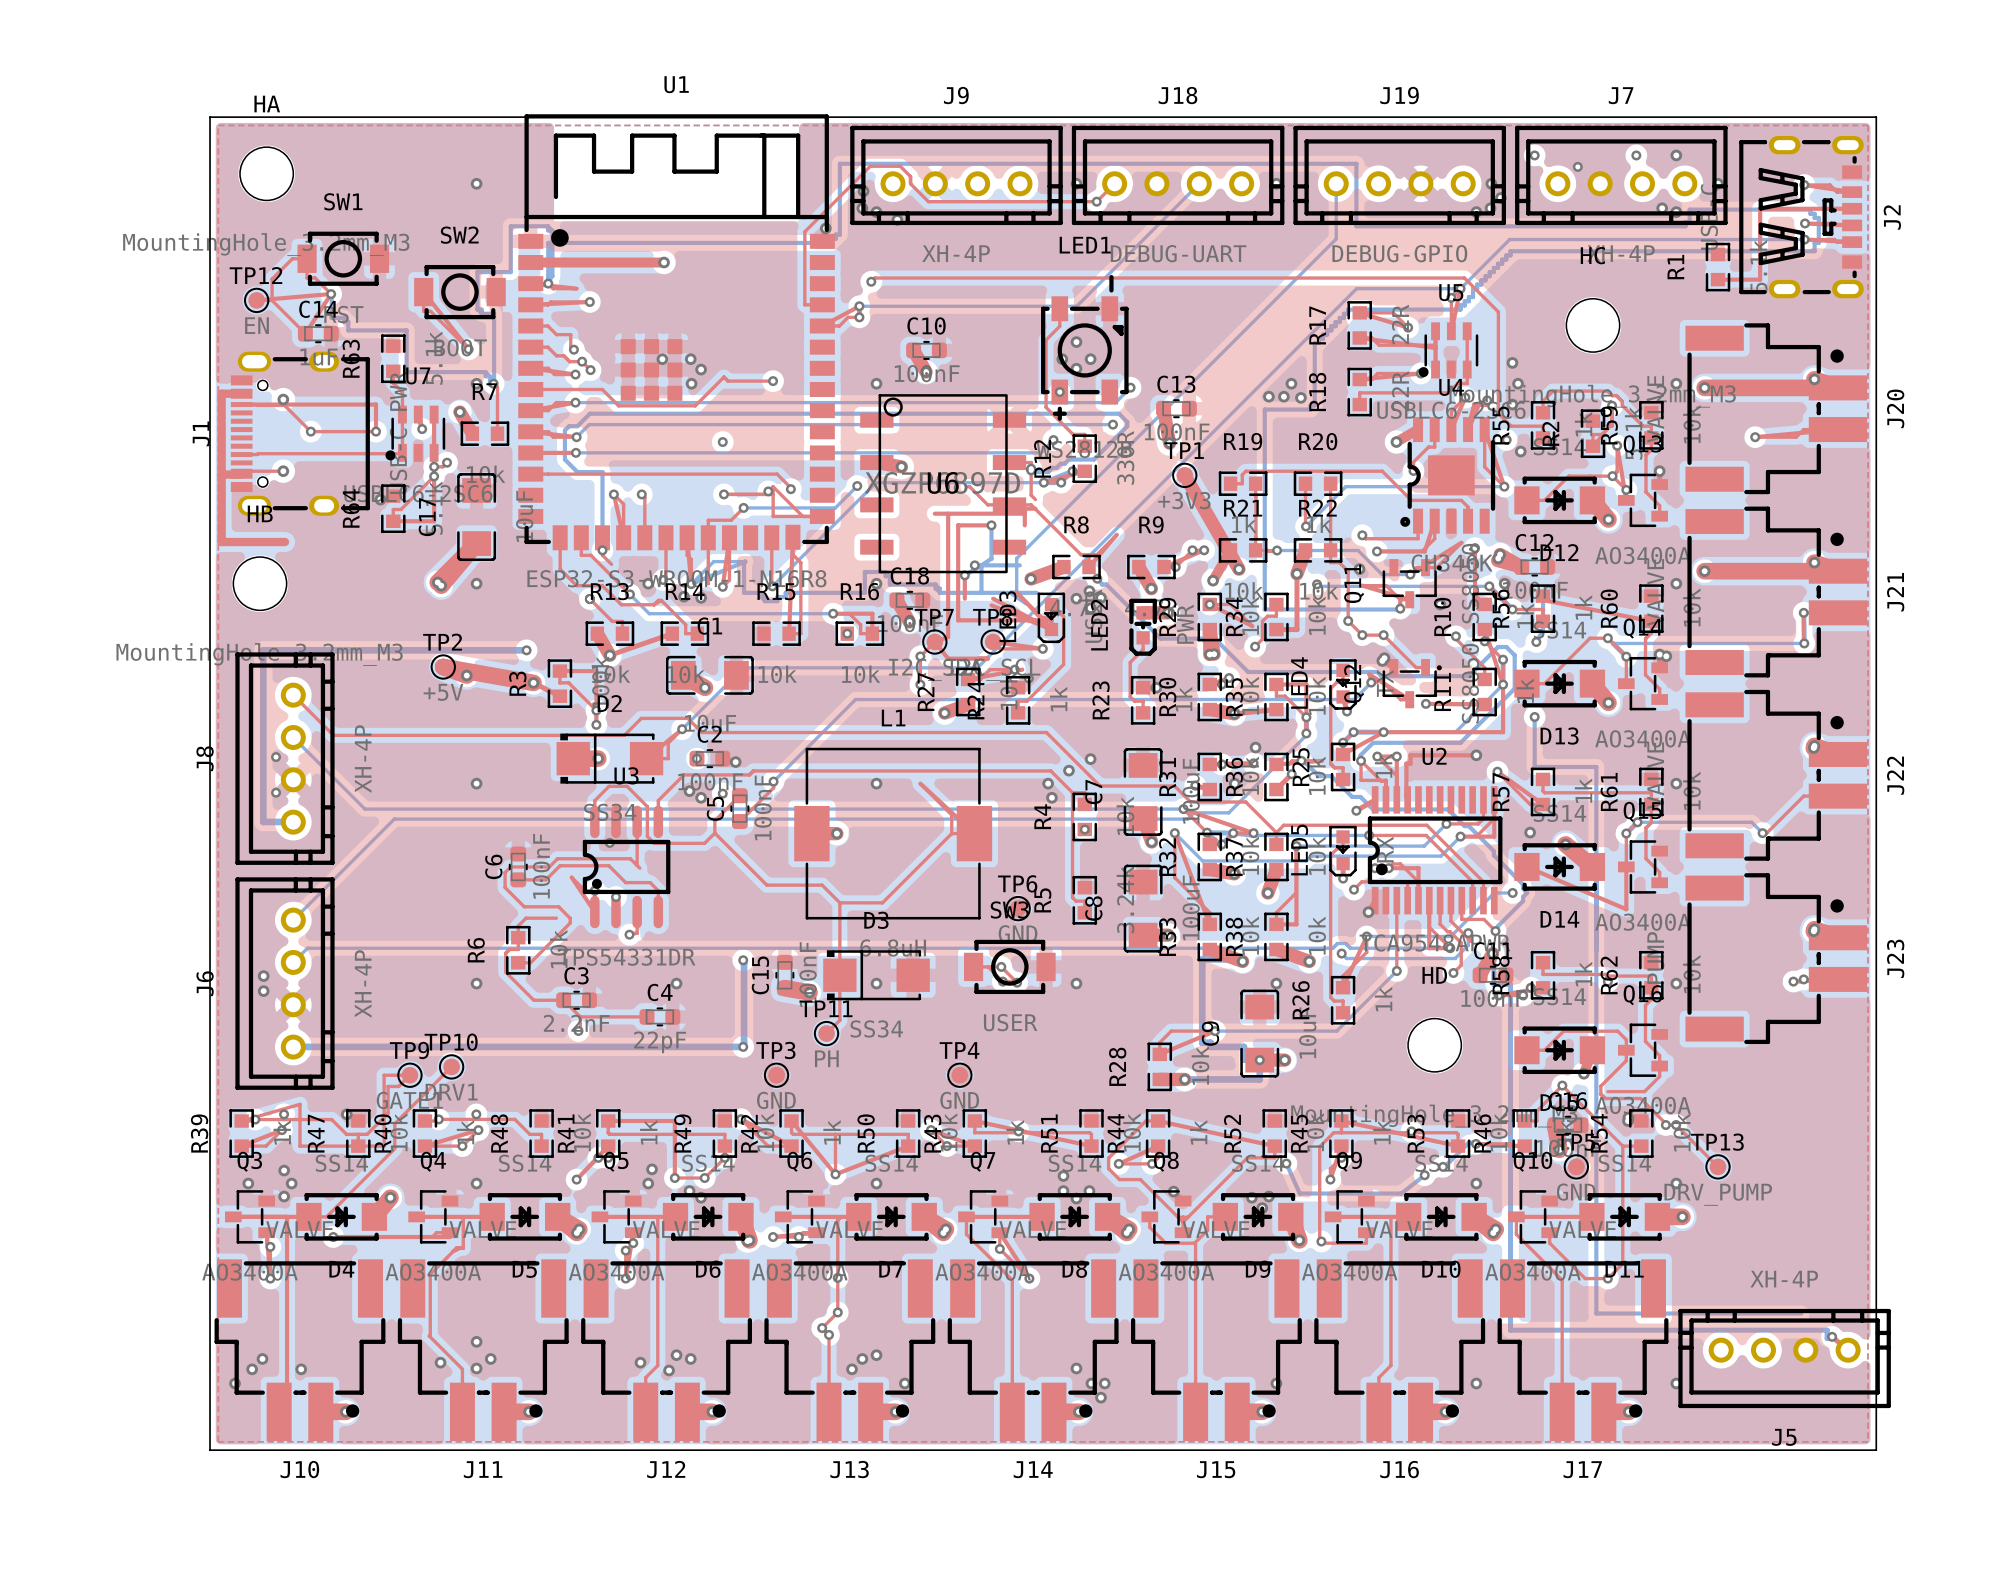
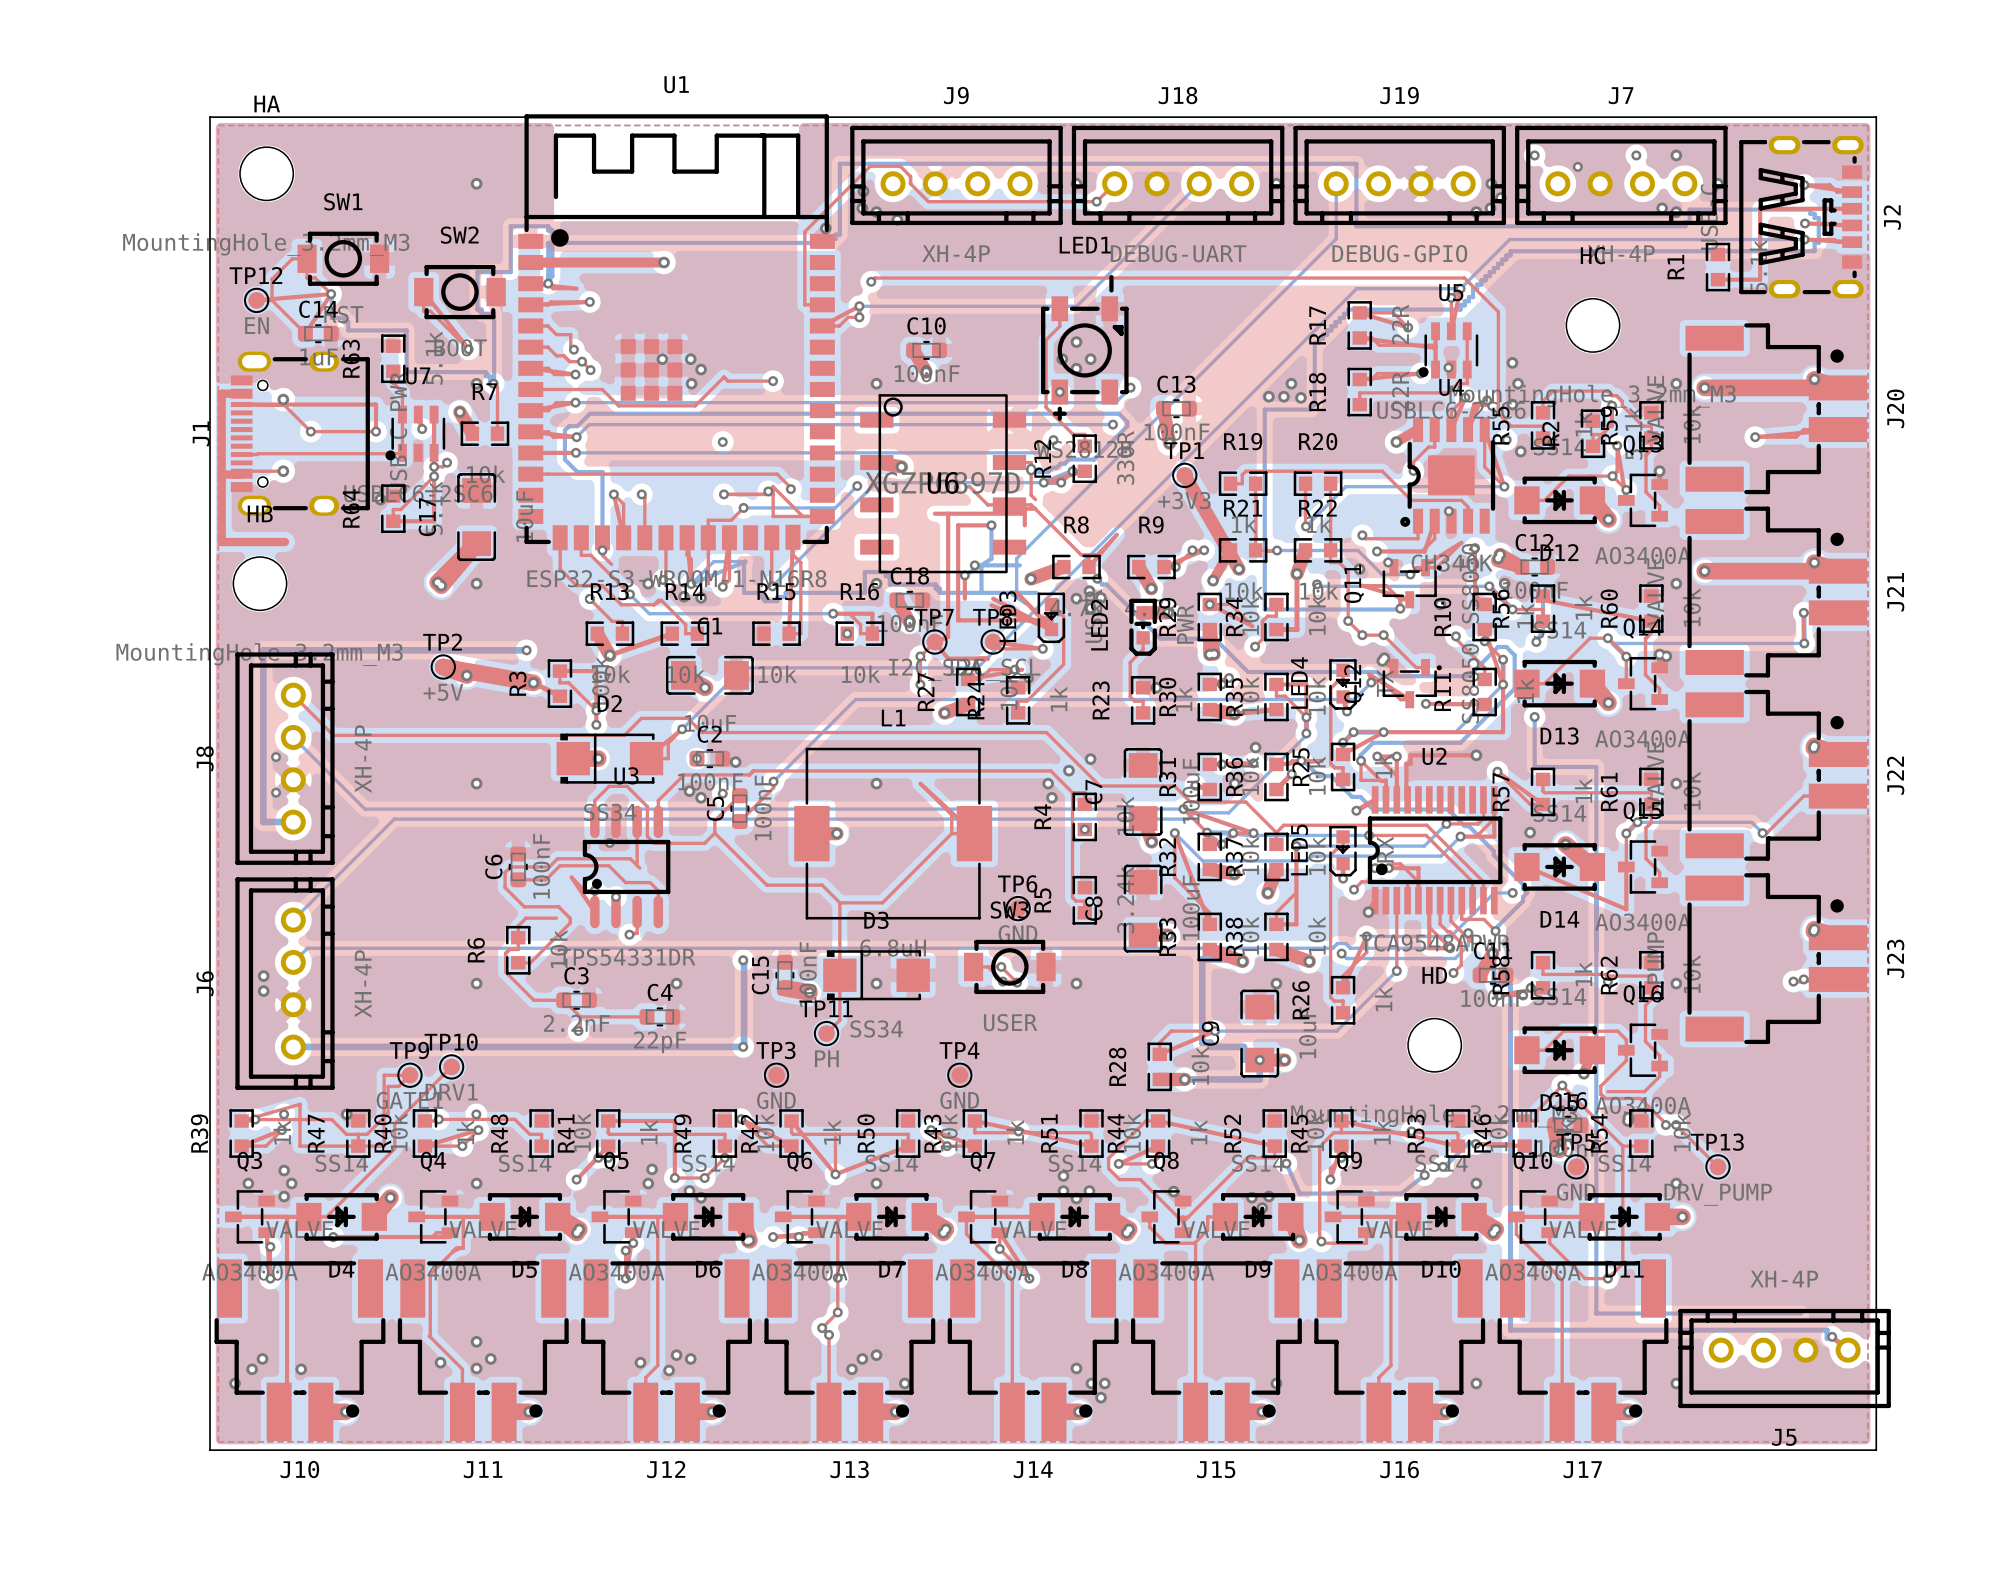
via: none -> (1448, 367)
via: none -> (1448, 511)
via: none -> (1388, 562)

